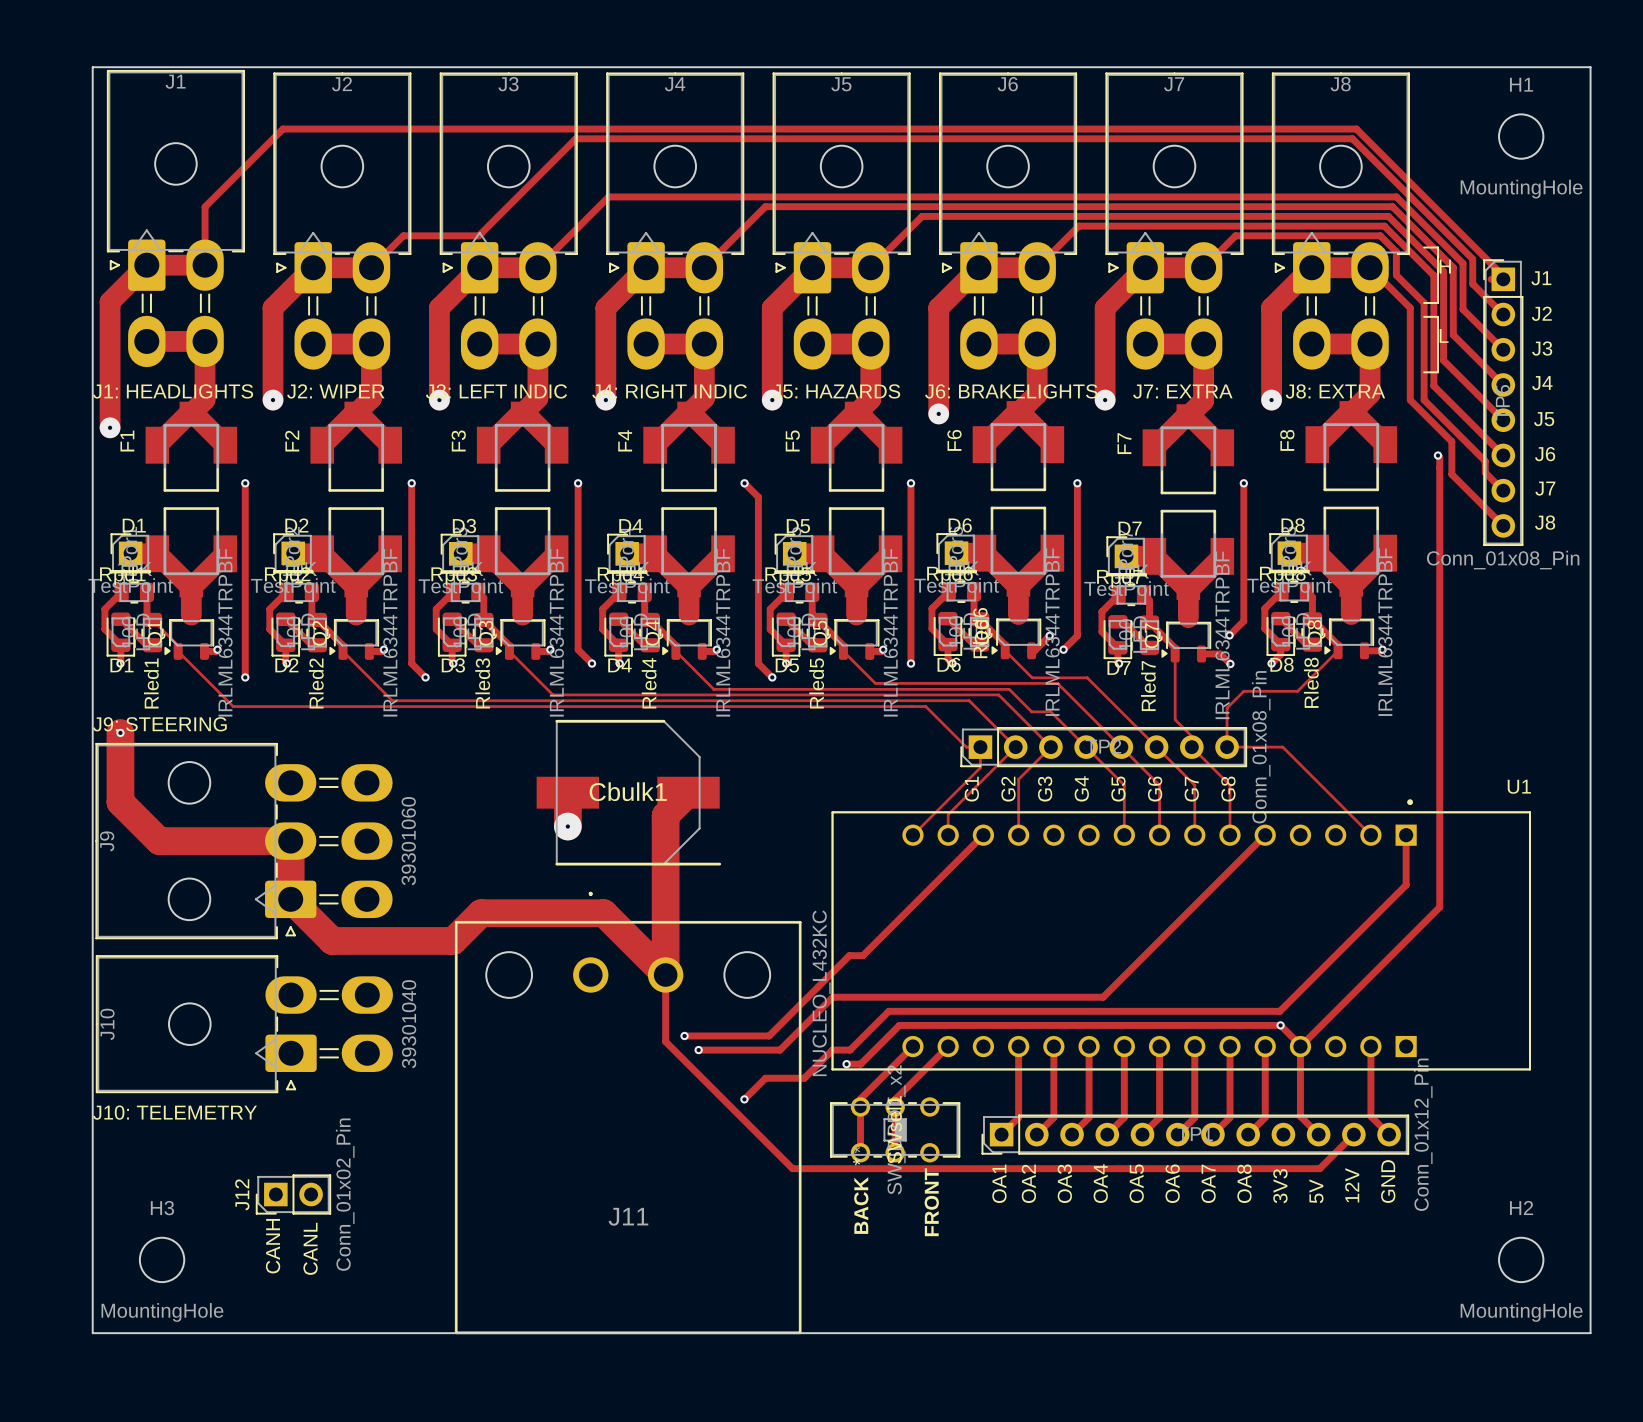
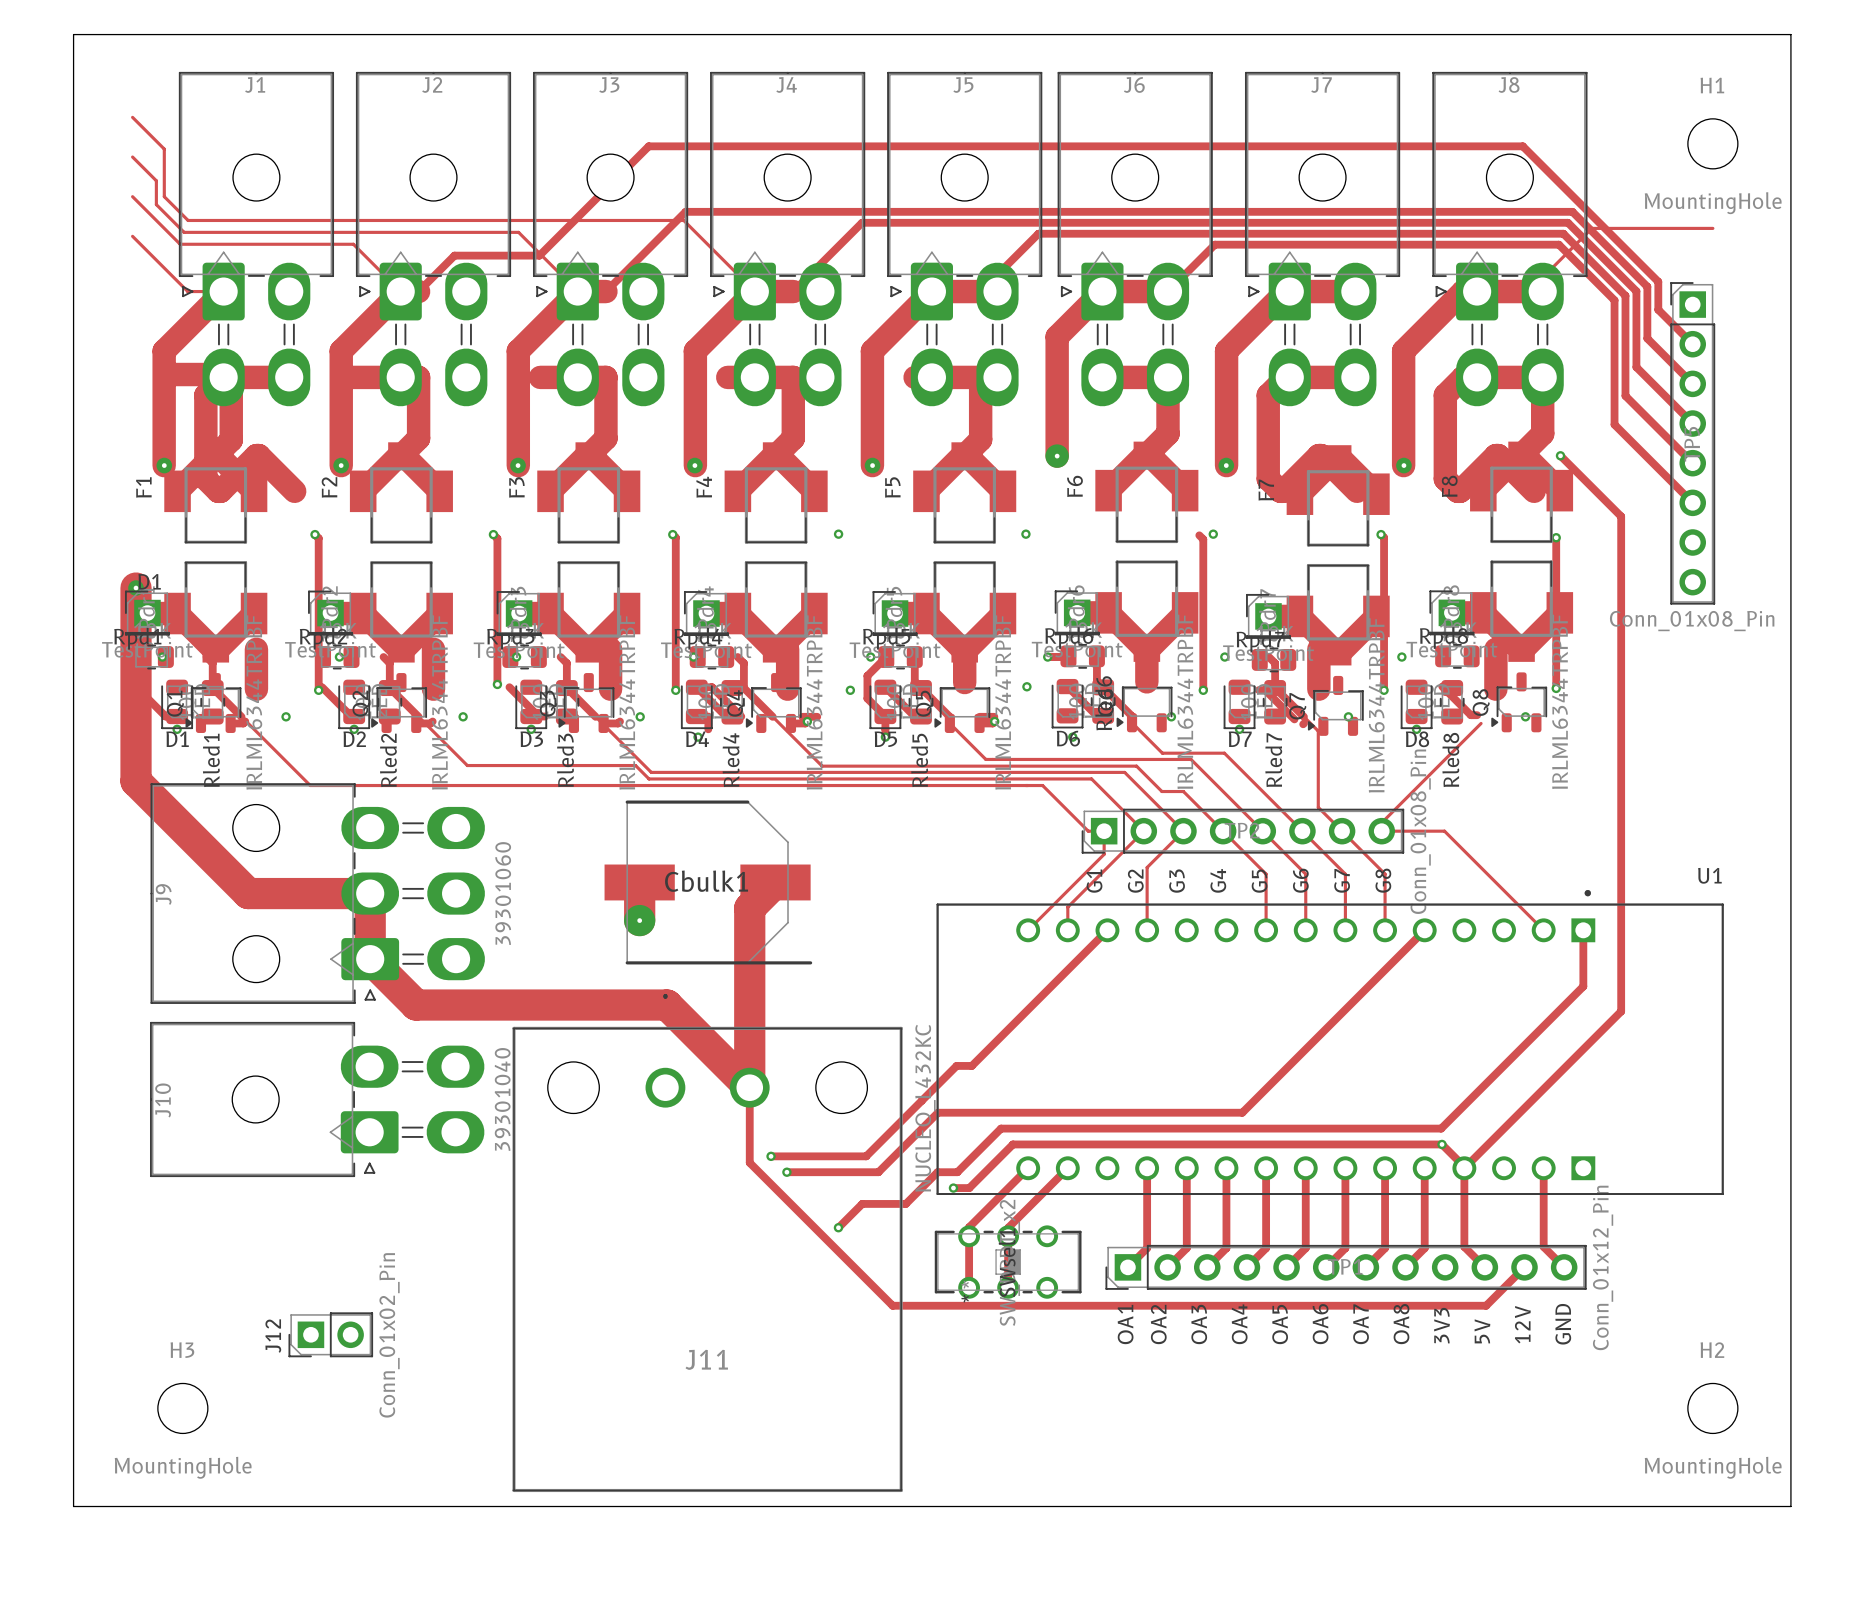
board edge: (1590, 67) (92, 67) (92, 1333) (1590, 1333) -> (1790, 65) (1790, 34) (73, 34) (73, 1506) (1790, 1506) (1790, 1490)
track: none -> (132, 117) (164, 149) (164, 196) (188, 220) (683, 220) (754, 291) (695, 351) (695, 465)
track: none -> (132, 157) (156, 180) (156, 204) (184, 232) (518, 232) (577, 291) (518, 351) (518, 465)
track: none -> (132, 196) (180, 244) (353, 244) (400, 291) (341, 351) (341, 465)
track: none -> (132, 236) (187, 291) (223, 291) (164, 351) (164, 465)
J1 position: (175, 218) -> (256, 239)
J2 position: (342, 221) -> (433, 239)
J3 position: (508, 221) -> (610, 239)
J4 position: (675, 221) -> (787, 239)
J5 position: (841, 221) -> (964, 239)
line: (1424, 247) (1437, 247) (1437, 302) (1424, 302) -> none
text: H (1445, 266) -> none
track: (355, 267) (313, 267) (273, 307) (273, 400) -> none
track: (512, 267) (479, 267) (439, 307) (439, 400) -> none
track: (670, 267) (646, 267) (605, 307) (605, 400) -> none
track: (827, 267) (812, 267) (772, 307) (772, 400) -> (931, 291) (872, 351) (872, 465)
track: (1145, 267) (1105, 307) (1105, 400) -> (1289, 291) (1286, 291) (1226, 351) (1226, 465)
track: (1200, 267) (1203, 267) (1235, 235) (1380, 235) (1396, 251) (1396, 275) (1424, 302) (1424, 400) (1485, 461) (1485, 472) (1503, 490) -> none
track: (1311, 267) (1271, 307) (1271, 400) -> (1477, 291) (1463, 291) (1403, 351) (1403, 465)
track: (1357, 267) (1370, 267) (1410, 307) (1410, 400) (1451, 441) (1451, 474) (1503, 525) -> (1528, 291) (1591, 228) (1712, 228)
text: J1 (1541, 278) -> none
track: (1491, 279) (1503, 279) (1503, 275) (1356, 129) (282, 129) (205, 206) (205, 265) (146, 265) (110, 301) (110, 427) -> none
text: J2 (1541, 313) -> none
line: (1424, 316) (1437, 316) (1437, 372) (1424, 372) -> none
text: L (1444, 335) -> none
track: none -> (289, 377) (223, 377) (205, 395) (205, 478) (218, 491) (220, 491) (256, 455) (258, 455) (294, 491)
track: none -> (1289, 377) (1286, 377) (1268, 395) (1268, 478) (1280, 491) (1283, 491) (1318, 455) (1321, 455) (1357, 491)
track: (1200, 344) (1203, 344) (1203, 400) (1188, 416) -> none
track: none -> (1477, 377) (1463, 377) (1445, 395) (1445, 478) (1457, 491) (1460, 491) (1495, 455) (1498, 455) (1534, 491)
text: J3 (1542, 348) -> none
text: J4 (1542, 383) -> none
text: J1: HEADLIGHTS (173, 391) -> none
text: J2: WIPER (335, 391) -> none
text: J3: LEFT INDIC (496, 391) -> none
text: J4: RIGHT INDIC (669, 391) -> none
text: J5: HAZARDS (836, 391) -> none
text: J6: BRAKELIGHTS (1011, 391) -> none
text: J7: EXTRA (1182, 391) -> none
text: J8: EXTRA (1335, 391) -> none
via: (273, 400) -> none
via: (439, 400) -> none
via: (605, 400) -> none
via: (772, 400) -> none
via: (1105, 400) -> none
via: (1271, 400) -> none
via: none -> (1560, 455)
text: J5 (1544, 419) -> none
via: none -> (164, 465)
via: none -> (341, 465)
via: none -> (518, 465)
via: none -> (694, 465)
via: none -> (872, 465)
via: none -> (1226, 465)
via: none -> (1403, 465)
via: (110, 427) -> none
text: J6 (1545, 454) -> none
track: (1437, 455) (1439, 467) -> (1560, 455) (1621, 516)
via: (1437, 455) -> none
track: (245, 483) (245, 677) -> none
via position: (245, 483) -> (315, 534)
track: none -> (315, 534) (318, 538) (318, 690)
track: (411, 483) (411, 663) (425, 677) -> none
via position: (411, 483) -> (493, 534)
track: none -> (493, 534) (497, 538) (497, 684)
track: (578, 483) (578, 649) (591, 663) -> none
via position: (578, 483) -> (672, 534)
track: none -> (672, 534) (675, 537) (675, 690)
track: (744, 483) (758, 497) (758, 663) (772, 677) -> none
track: (910, 483) (910, 663) -> none
track: (1077, 483) (1077, 635) (1063, 649) -> none
track: none -> (1381, 534) (1384, 537) (1384, 690)
track: (1243, 483) (1243, 621) (1229, 635) -> none
via position: (1243, 483) -> (1381, 534)
track: none -> (1199, 535) (1203, 539) (1203, 689)
track: none -> (1556, 537) (1556, 688)
via: none -> (1556, 537)
text: J7 (1545, 488) -> none
text: J8 (1545, 522) -> none
text: D2 (296, 525) -> none
text: D6 (960, 525) -> none
text: D8 (1293, 525) -> none
text: D3 (464, 526) -> none
text: D4 (631, 526) -> none
text: D5 (798, 526) -> none
text: D7 (1130, 528) -> none
via: none -> (136, 588)
track: (1351, 584) (1351, 614) -> none
track: (191, 585) (191, 615) -> none
track: none -> (256, 649) (256, 689)
track: (356, 585) (356, 615) -> none
track: none -> (433, 649) (433, 689)
track: (522, 585) (522, 615) -> none
track: none -> (610, 649) (610, 689)
track: (689, 585) (689, 615) -> none
track: none -> (787, 649) (787, 689)
track: none -> (1318, 649) (1318, 689)
track: none -> (1495, 649) (1495, 689)
track: (1188, 588) (1188, 617) -> none
track: (948, 591) (931, 608) (931, 628) (947, 644) (947, 658) (952, 663) -> none
track: (1281, 591) (1264, 608) (1264, 628) (1280, 644) (1280, 654) (1271, 663) -> none
track: (1306, 591) (1312, 597) (1312, 619) (1338, 645) (1338, 650) (1297, 691) (1243, 691) (1227, 708) (1227, 739) -> (1481, 723) (1381, 822)
track: (121, 592) (104, 609) (104, 629) (120, 645) (120, 663) -> none
via: none -> (162, 657)
track: (146, 592) (146, 614) (178, 645) (178, 651) (233, 706) (275, 706) -> (206, 657) (212, 663) (212, 688) (310, 785)
track: (286, 592) (269, 609) (269, 629) (285, 645) (286, 663) -> none
via: none -> (339, 657)
track: (311, 592) (311, 614) (343, 645) (343, 651) (392, 700) (576, 700) -> (383, 657) (389, 663) (389, 688) (467, 765) (635, 765) (649, 778)
track: (452, 592) (436, 609) (436, 629) (452, 645) (453, 663) -> none
via: none -> (516, 657)
track: (478, 592) (483, 597) (483, 619) (509, 645) (509, 651) (552, 694) (578, 694) -> (595, 716) (651, 772)
track: none -> (560, 657) (566, 663) (566, 688) (595, 716)
via: none -> (693, 657)
track: (619, 592) (602, 609) (602, 629) (618, 645) (619, 663) -> none
track: (644, 592) (644, 614) (675, 645) (675, 651) (713, 689) (729, 689) -> (772, 716) (822, 766)
track: none -> (737, 657) (743, 663) (743, 688) (772, 716)
via: none -> (870, 657)
via: none -> (1047, 657)
via: none -> (1224, 657)
via: none -> (1401, 657)
track: (1118, 594) (1101, 611) (1101, 631) (1117, 647) (1119, 663) -> none
track: (1144, 594) (1149, 600) (1149, 622) (1175, 648) (1175, 719) (1191, 736) (1191, 747) -> (1268, 657) (1275, 663) (1275, 688) (1318, 731) (1318, 807) (1342, 831)
via: none -> (497, 684)
via: none -> (1026, 686)
track: none -> (708, 687) (712, 687) (741, 716)
via: none -> (1556, 688)
via: none -> (318, 690)
via: none -> (675, 690)
via: none -> (850, 690)
via: none -> (1203, 690)
Rled1 position: (152, 632) -> (212, 702)
Rled2 position: (317, 632) -> (389, 702)
Rled3 position: (483, 632) -> (566, 702)
Rled8 position: (1312, 632) -> (1452, 702)
D8 position: (1280, 633) -> (1416, 704)
D1 position: (120, 634) -> (177, 704)
D2 position: (285, 634) -> (354, 704)
D3 position: (452, 634) -> (531, 704)
track: (1049, 635) (1034, 650) (1031, 650) -> none
via: (1049, 635) -> none
Rled7 position: (1149, 635) -> (1275, 702)
via position: (1229, 635) -> (1384, 690)
D7 position: (1117, 637) -> (1239, 704)
via: none -> (286, 716)
via: none -> (463, 716)
via: none -> (640, 716)
track: none -> (708, 716) (708, 729)
track: none -> (802, 716) (817, 716)
track: none -> (979, 716) (994, 716)
via: none -> (1171, 716)
via: none -> (1348, 716)
via: none -> (1525, 716)
via: (217, 649) -> none
via: (383, 649) -> none
via: (550, 649) -> none
via: (1063, 649) -> none
track: (1382, 649) (1364, 650) -> none
via: (1382, 649) -> none
track: none -> (1304, 723) (1303, 724)
track: (1201, 654) (1220, 654) (1230, 663) -> none
via: none -> (177, 729)
via: none -> (354, 729)
via: none -> (1239, 729)
via: none -> (1416, 729)
via: (120, 663) -> none
via: (286, 663) -> none
via position: (453, 663) -> (531, 729)
via: (591, 663) -> none
via: (910, 663) -> none
via: (1119, 663) -> none
via: (1230, 663) -> none
via: (1271, 663) -> none
via: (245, 677) -> none
via: (425, 677) -> none
via: (772, 677) -> none
text: J9: STEERING (159, 724) -> none
track: (120, 732) (120, 802) (159, 841) (290, 841) (290, 899) (332, 940) (453, 940) (481, 913) (603, 913) -> (136, 588) (136, 781) (248, 893) (370, 893) (370, 959) (416, 1005) (667, 1005) (680, 1018)
via: (120, 732) -> none
J9 position: (244, 841) -> (317, 893)
J10 position: (244, 1024) -> (317, 1099)
text: J10: TELEMETRY (174, 1112) -> none
text: FRONT (931, 1202) -> none
text: BACK (861, 1205) -> none
text: CANH (273, 1246) -> none
text: CANL (310, 1248) -> none

